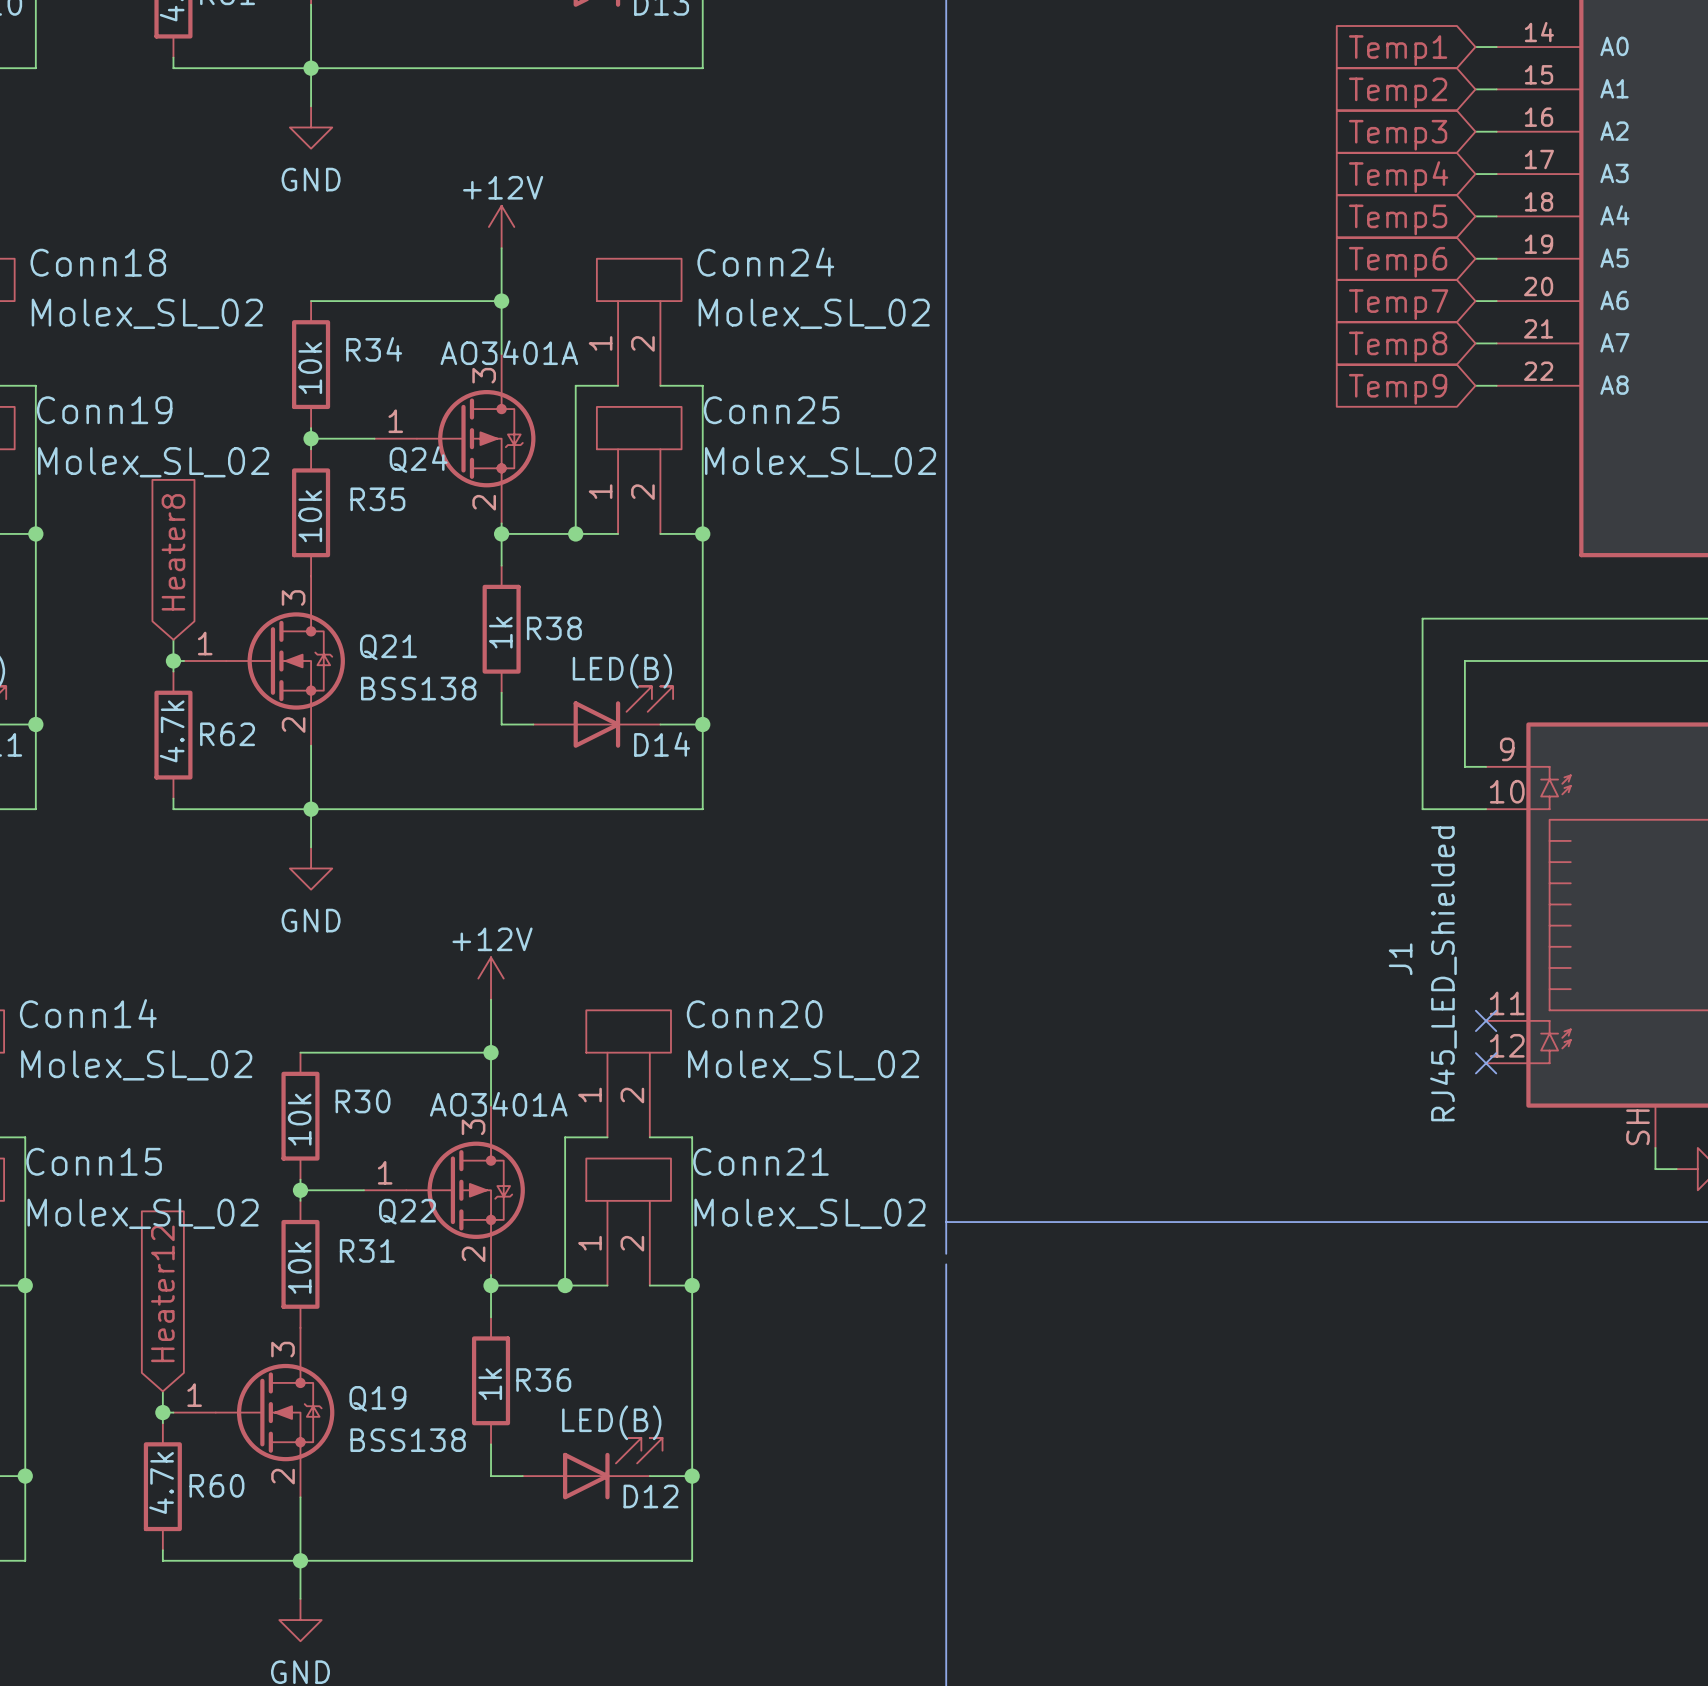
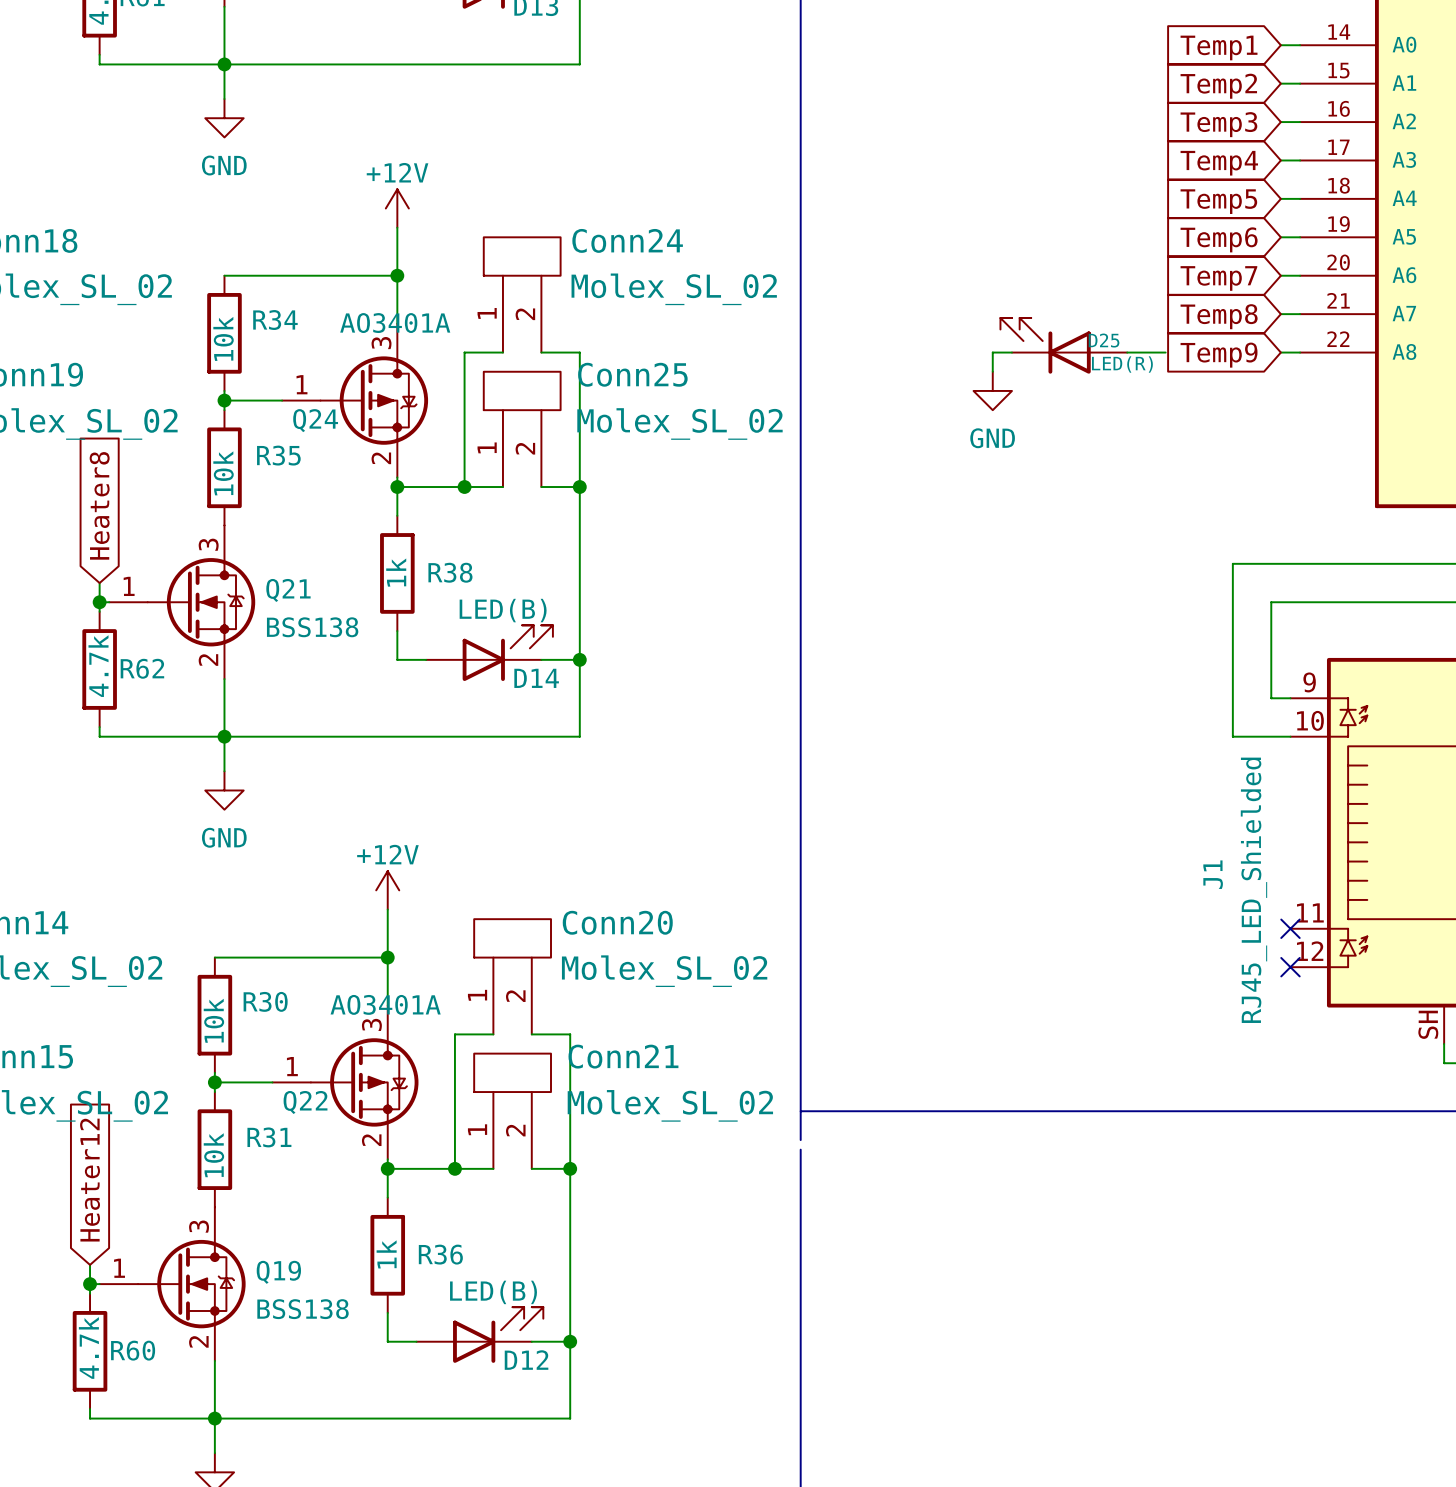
D25: none -> LED(R) (1063, 345)
wire: none -> (1011, 352) (992, 352) (992, 371)
wire: none -> (1127, 352) (1165, 352)
power symbol: none -> GND (992, 390)

